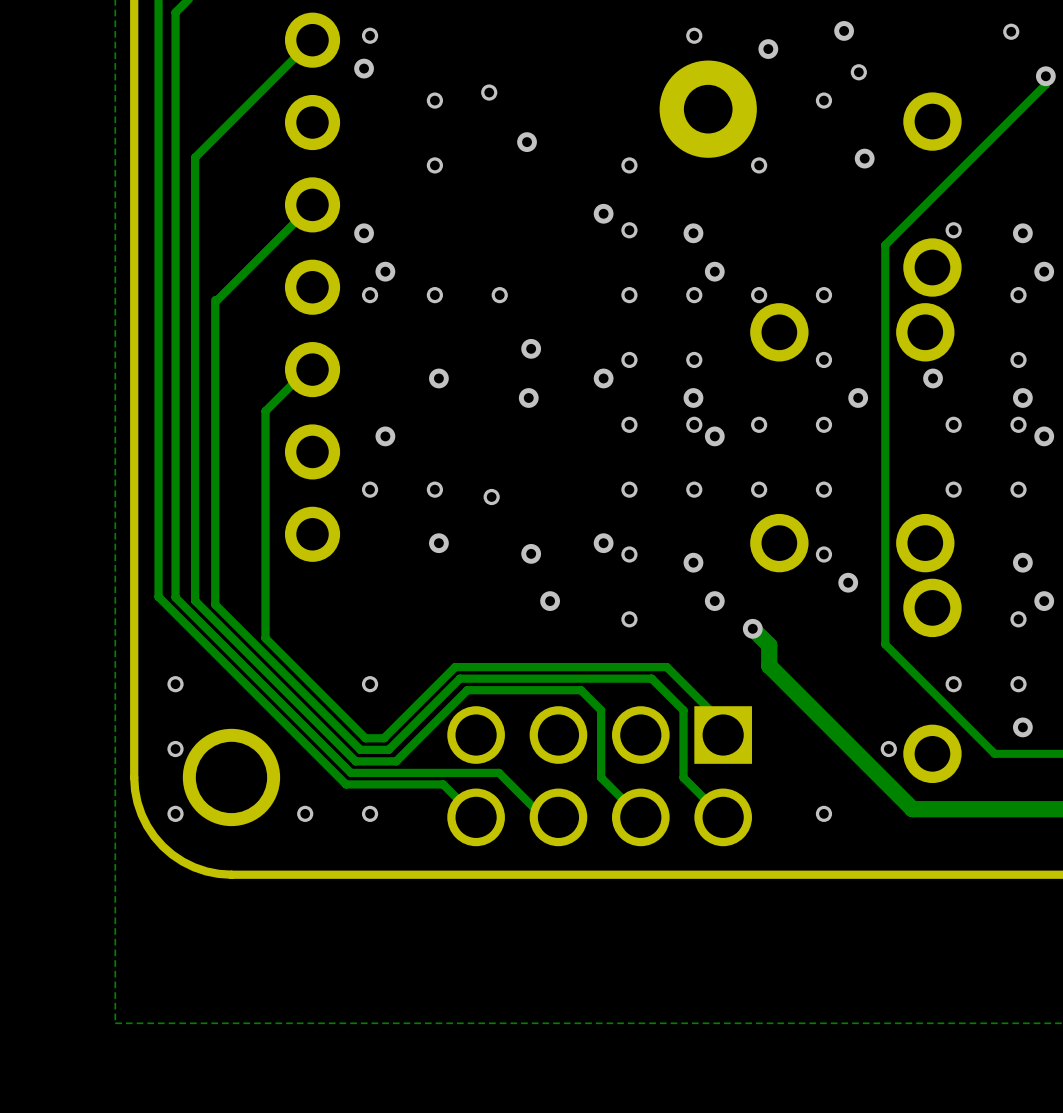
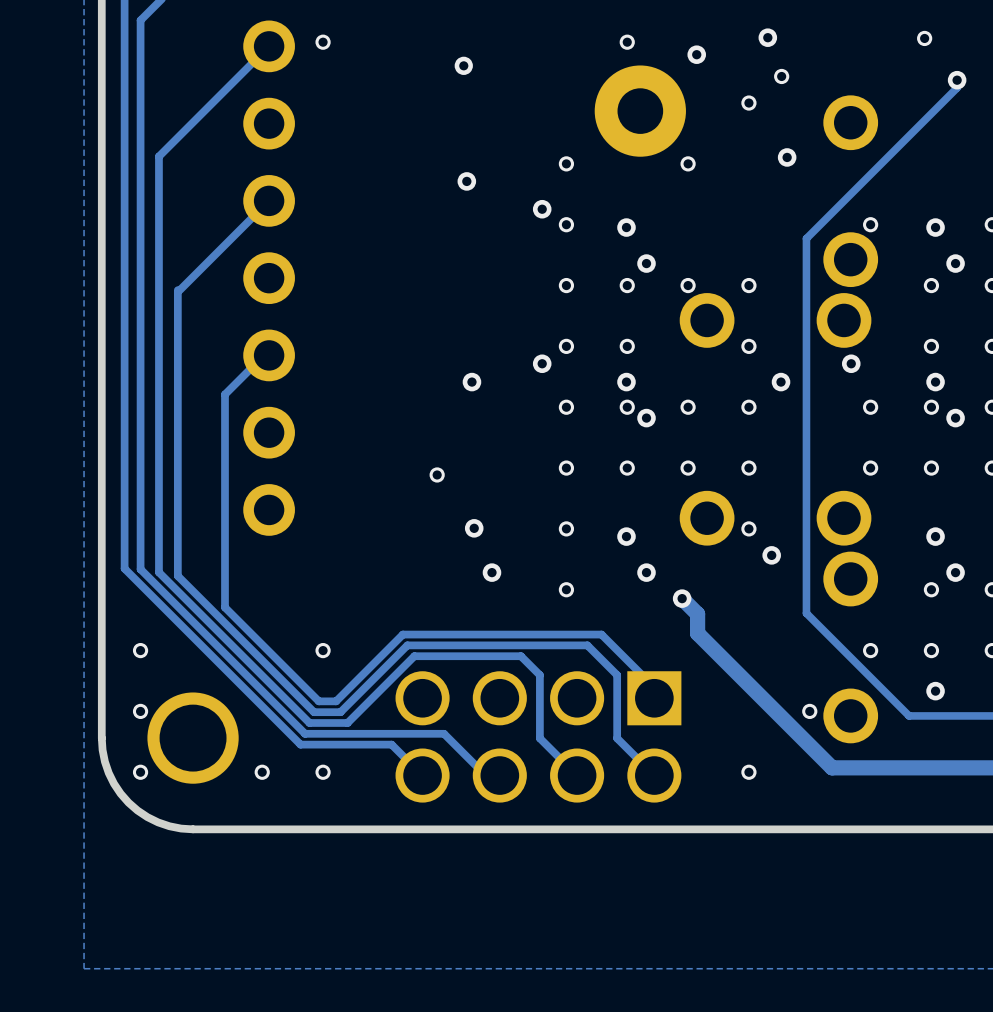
via: none -> (463, 65)
via: (364, 68) -> none
via: (489, 92) -> none
via: (434, 100) -> none
via: (527, 142) -> none
via: (434, 165) -> none
via: none -> (466, 181)
via: (364, 233) -> none
via: (385, 271) -> none
via: (370, 295) -> none
via: (434, 295) -> none
via: (499, 295) -> none
via: (531, 348) -> none
via: (438, 378) -> none
via: (385, 436) -> none
via: (370, 489) -> none
via: (434, 489) -> none
via: (438, 543) -> none
via: (603, 543) -> none

